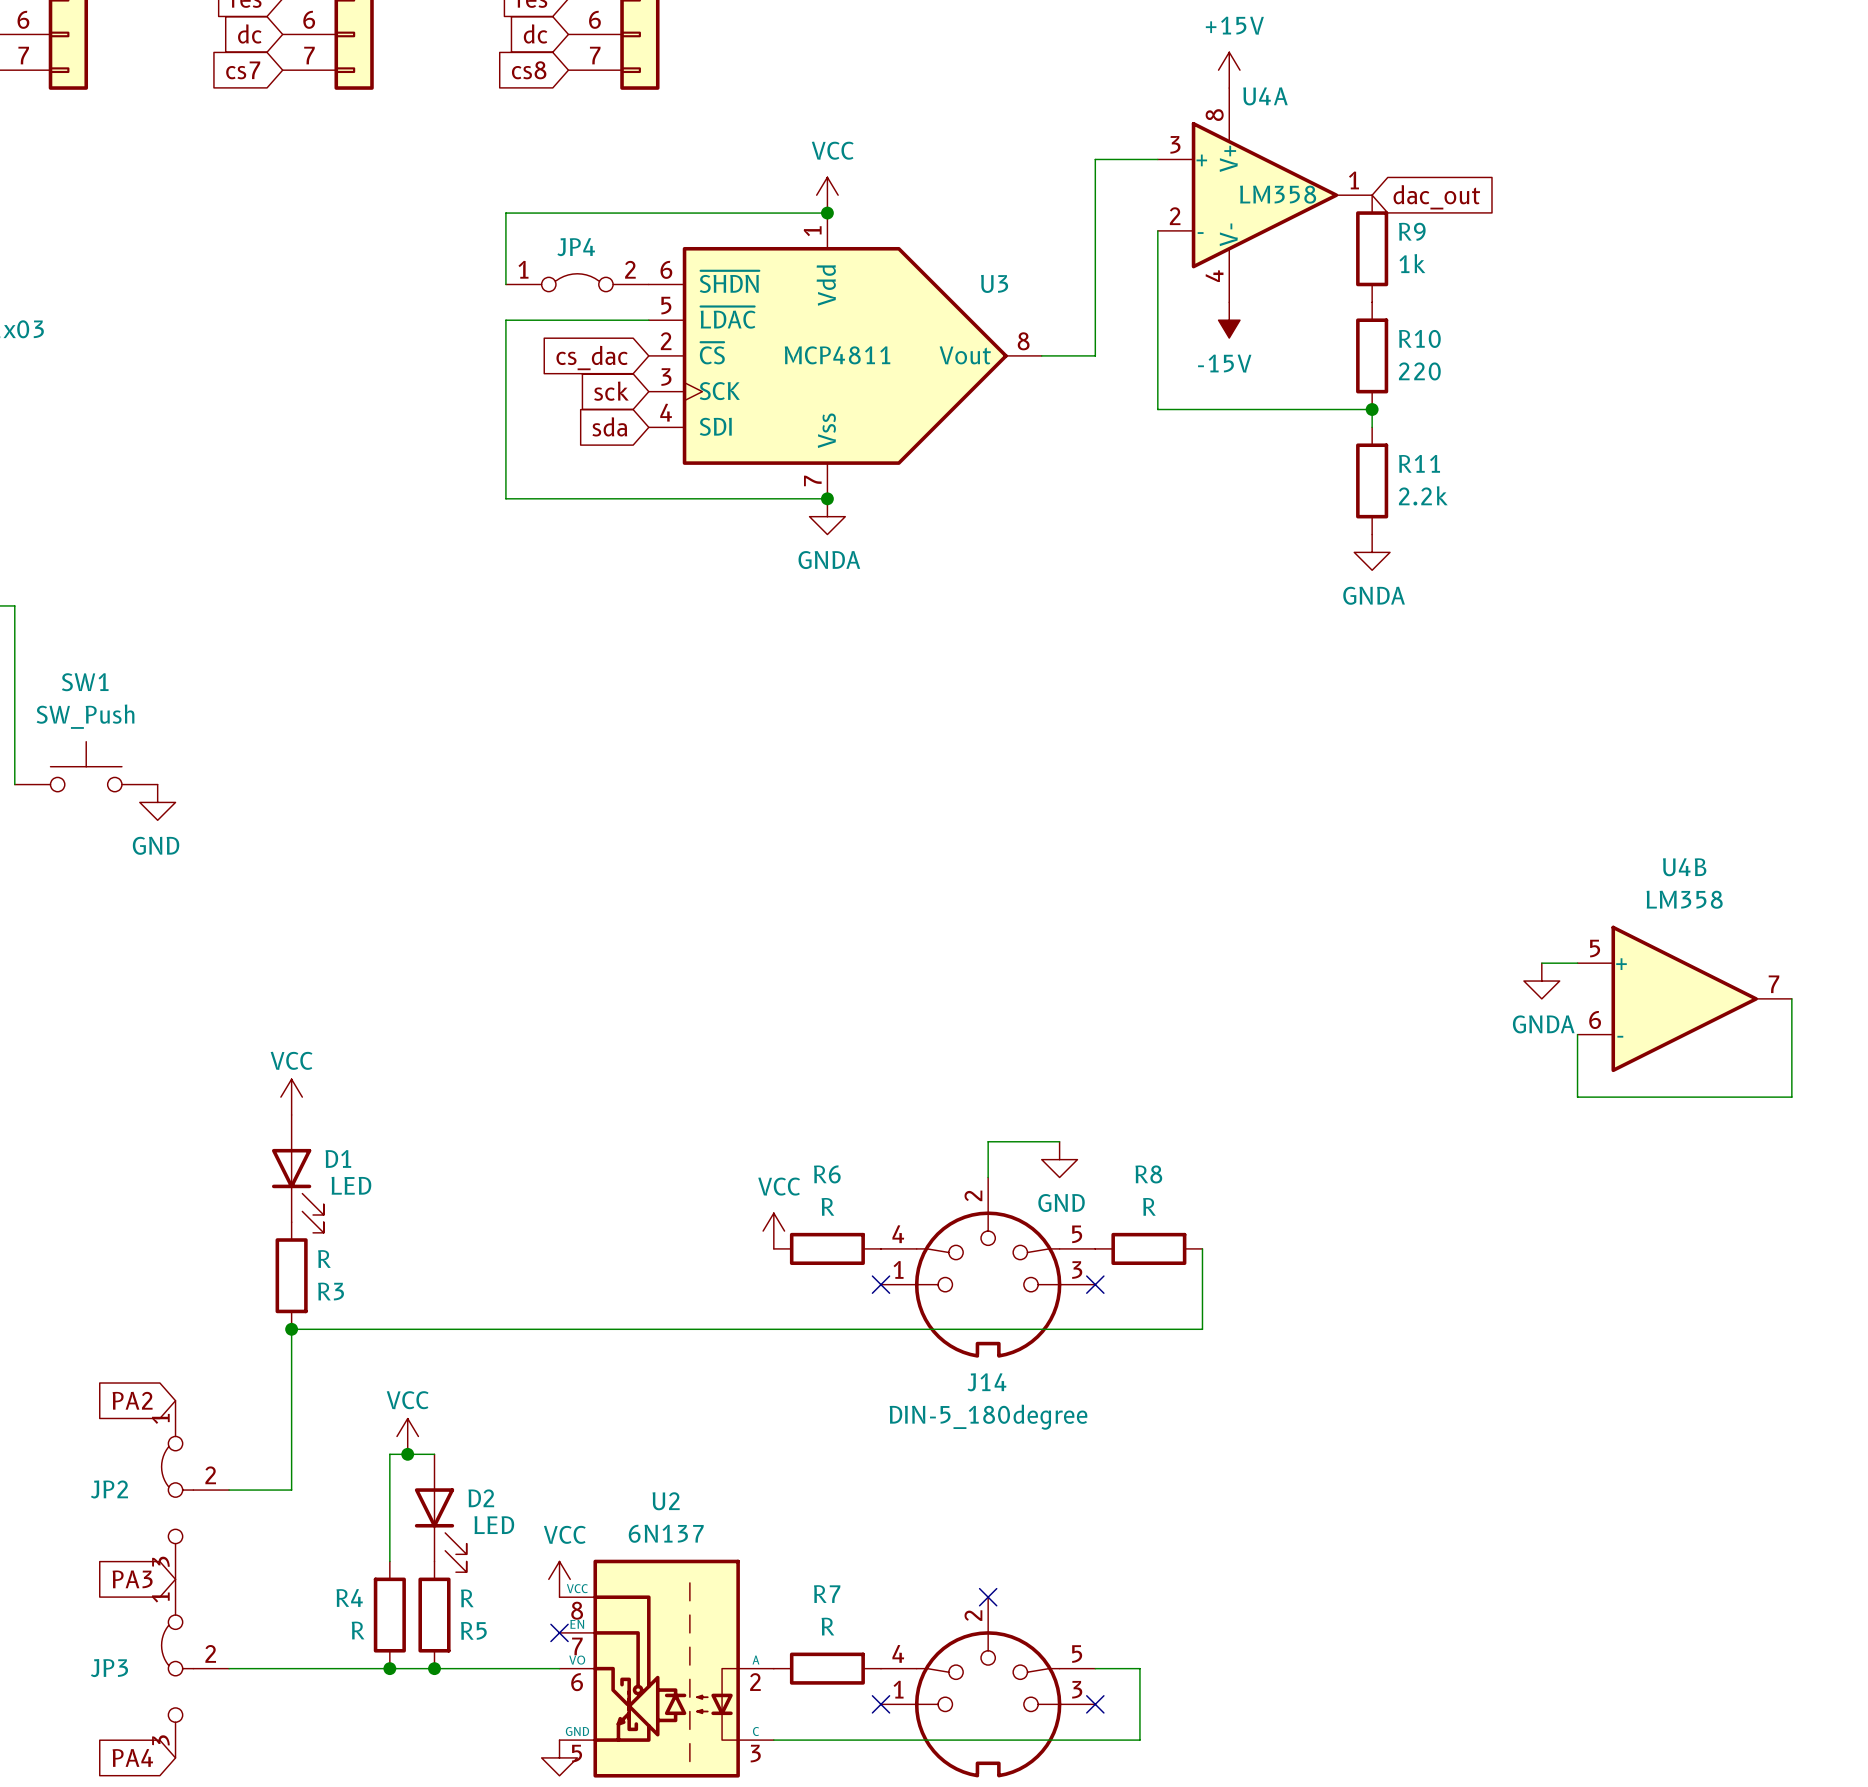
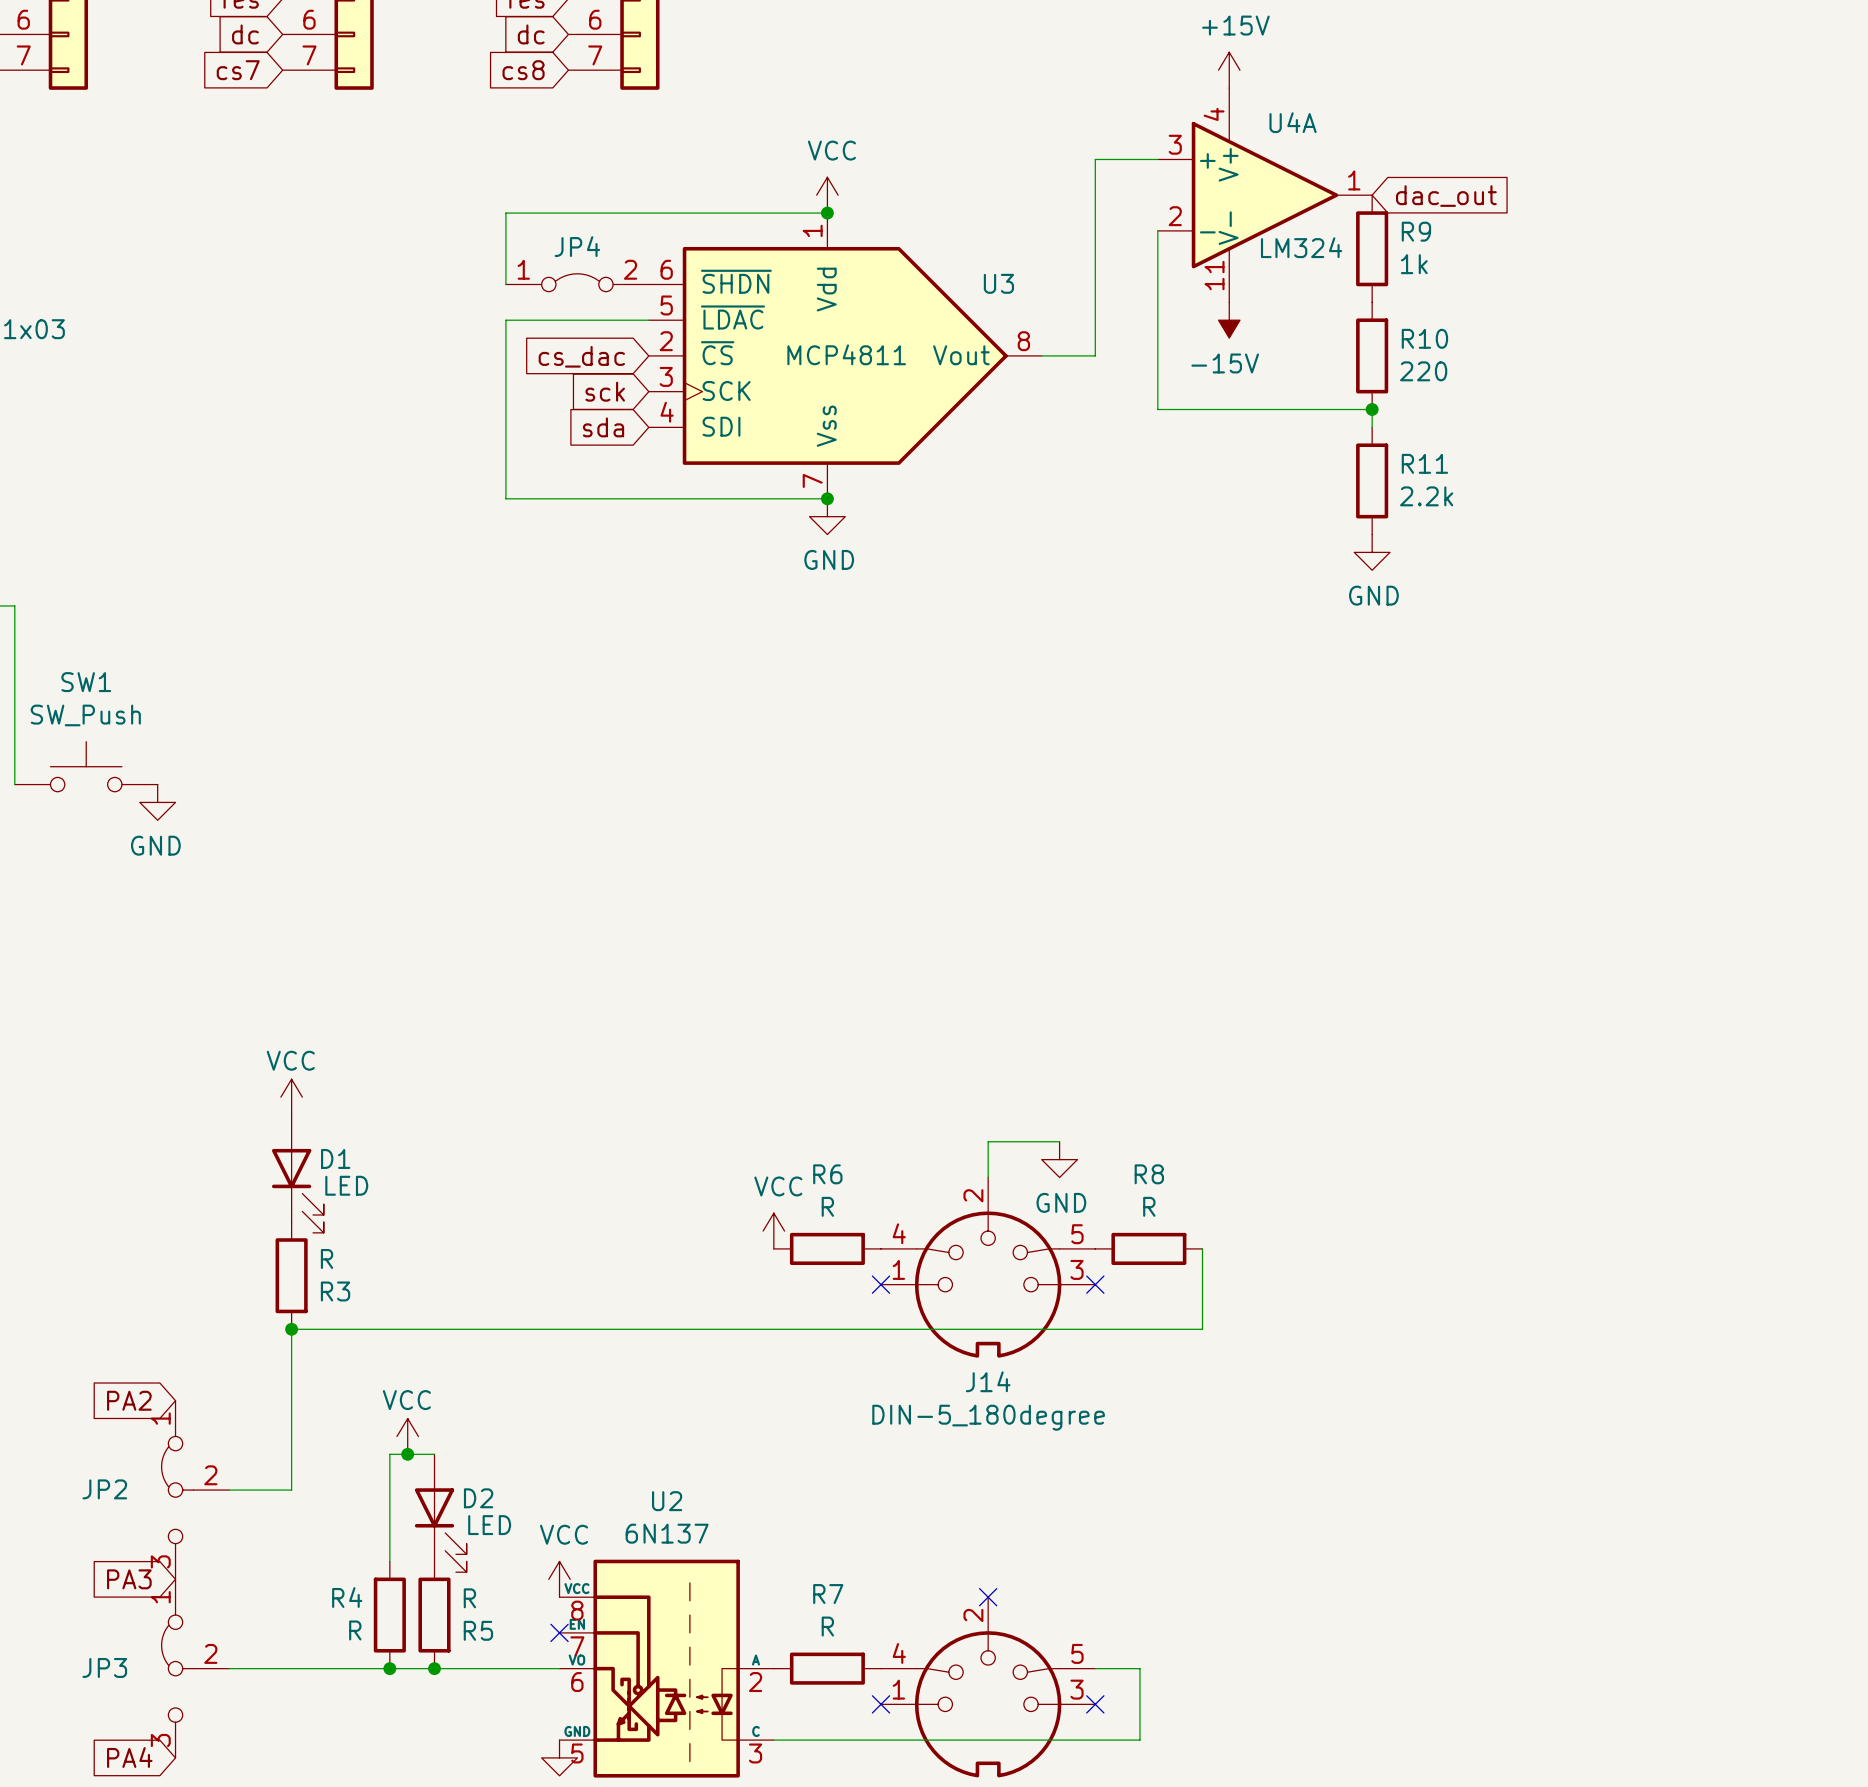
U4A name position: U4A (1265, 96) -> U4A (1293, 122)
part pin number: 8 (1214, 115) -> 4 (1214, 114)
part value: LM358 (1278, 194) -> none
U4A value: none -> LM324 (1301, 247)
part pin number: 4 (1214, 276) -> 11 (1214, 275)
power symbol: GNDA (827, 516) -> GND (827, 516)
power symbol: GNDA (1372, 552) -> GND (1372, 552)
wire: (1541, 963) (1577, 963) -> none
power symbol: GNDA (1541, 981) -> none
U4B: LM358 (1684, 998) -> none
wire: (1791, 998) (1791, 1097) (1577, 1097) (1577, 1034) -> none

